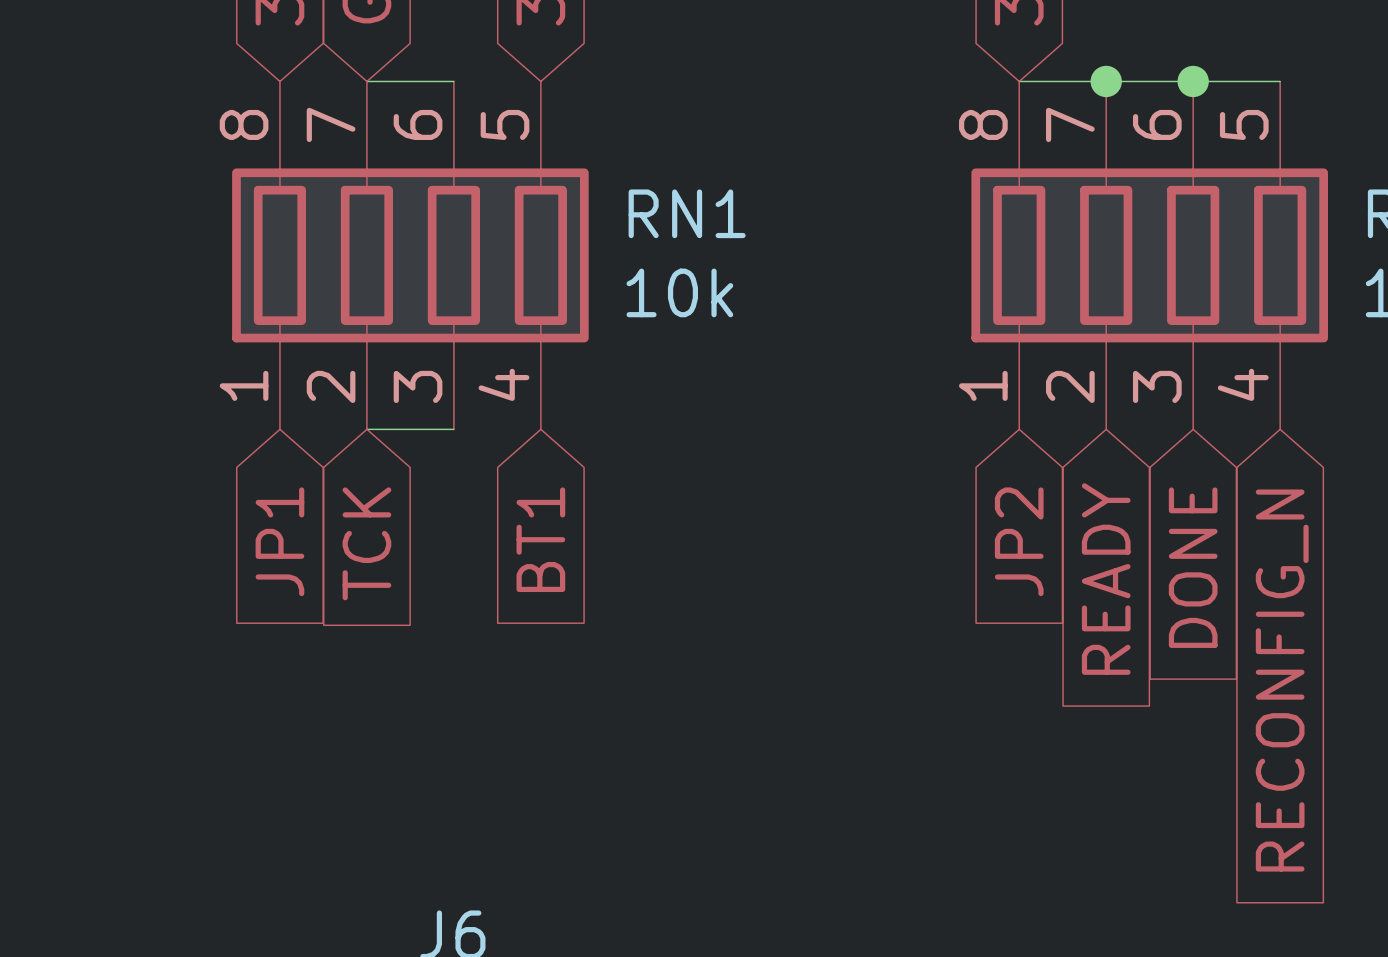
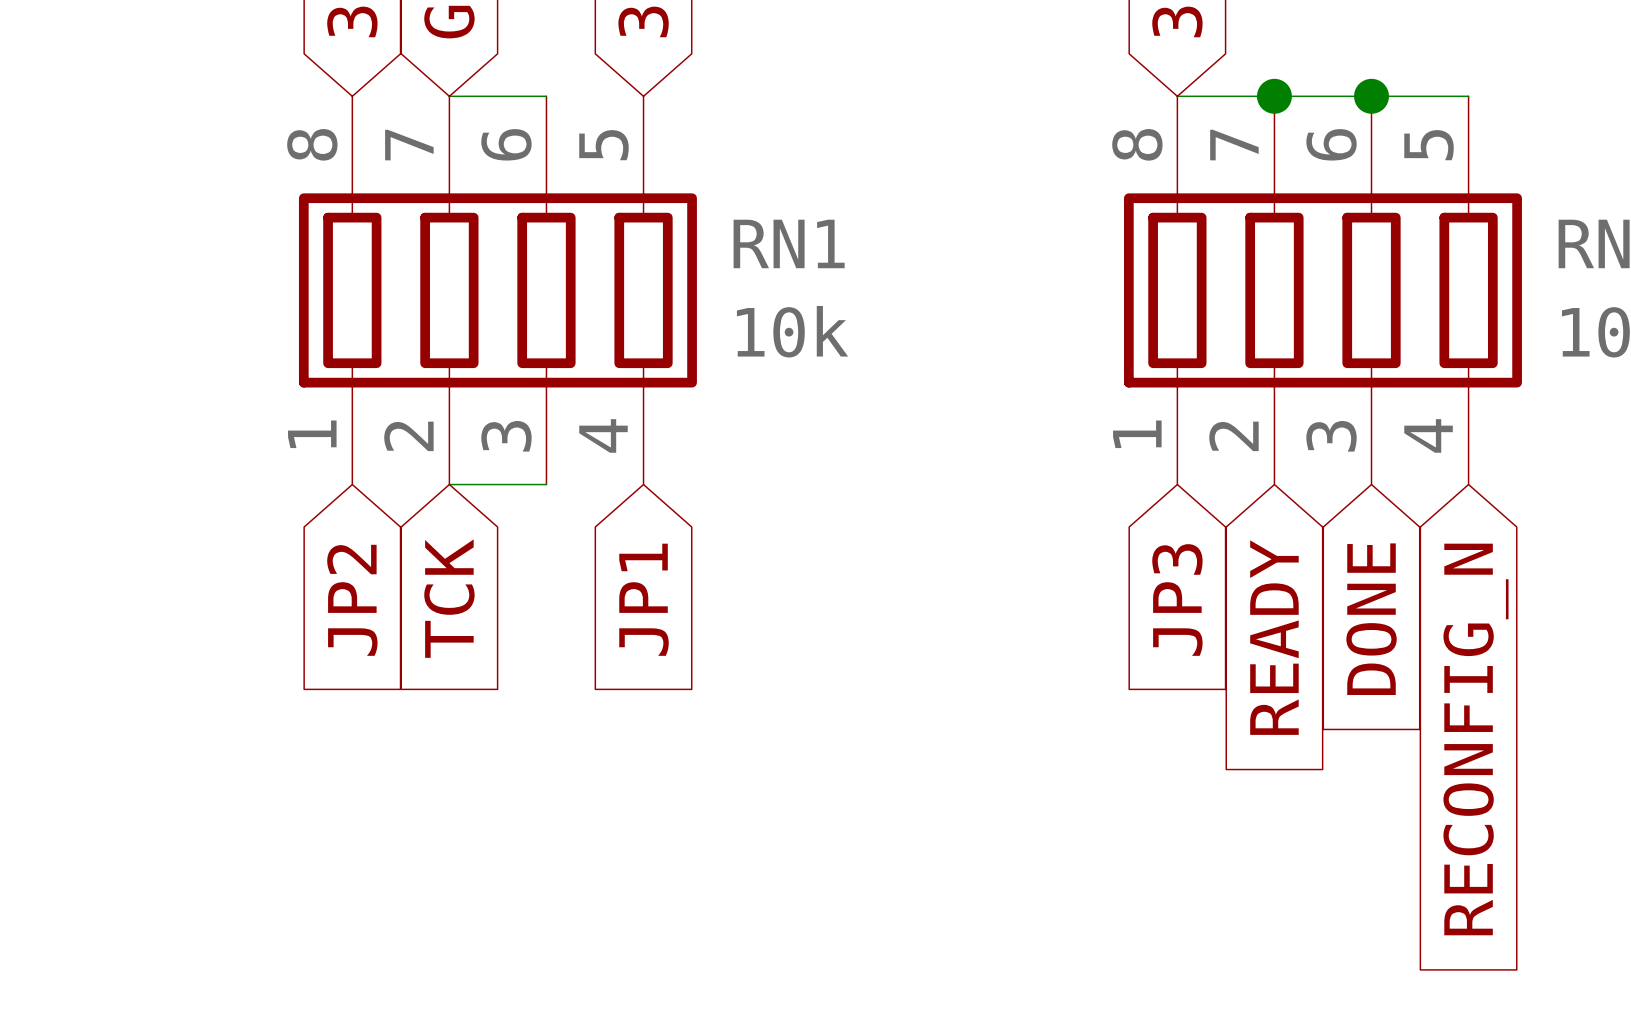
global label: BT1 (540, 539) -> JP1 (644, 599)
global label: JP1 (279, 541) -> JP2 (352, 600)
global label: JP2 (1019, 541) -> JP3 (1177, 599)

